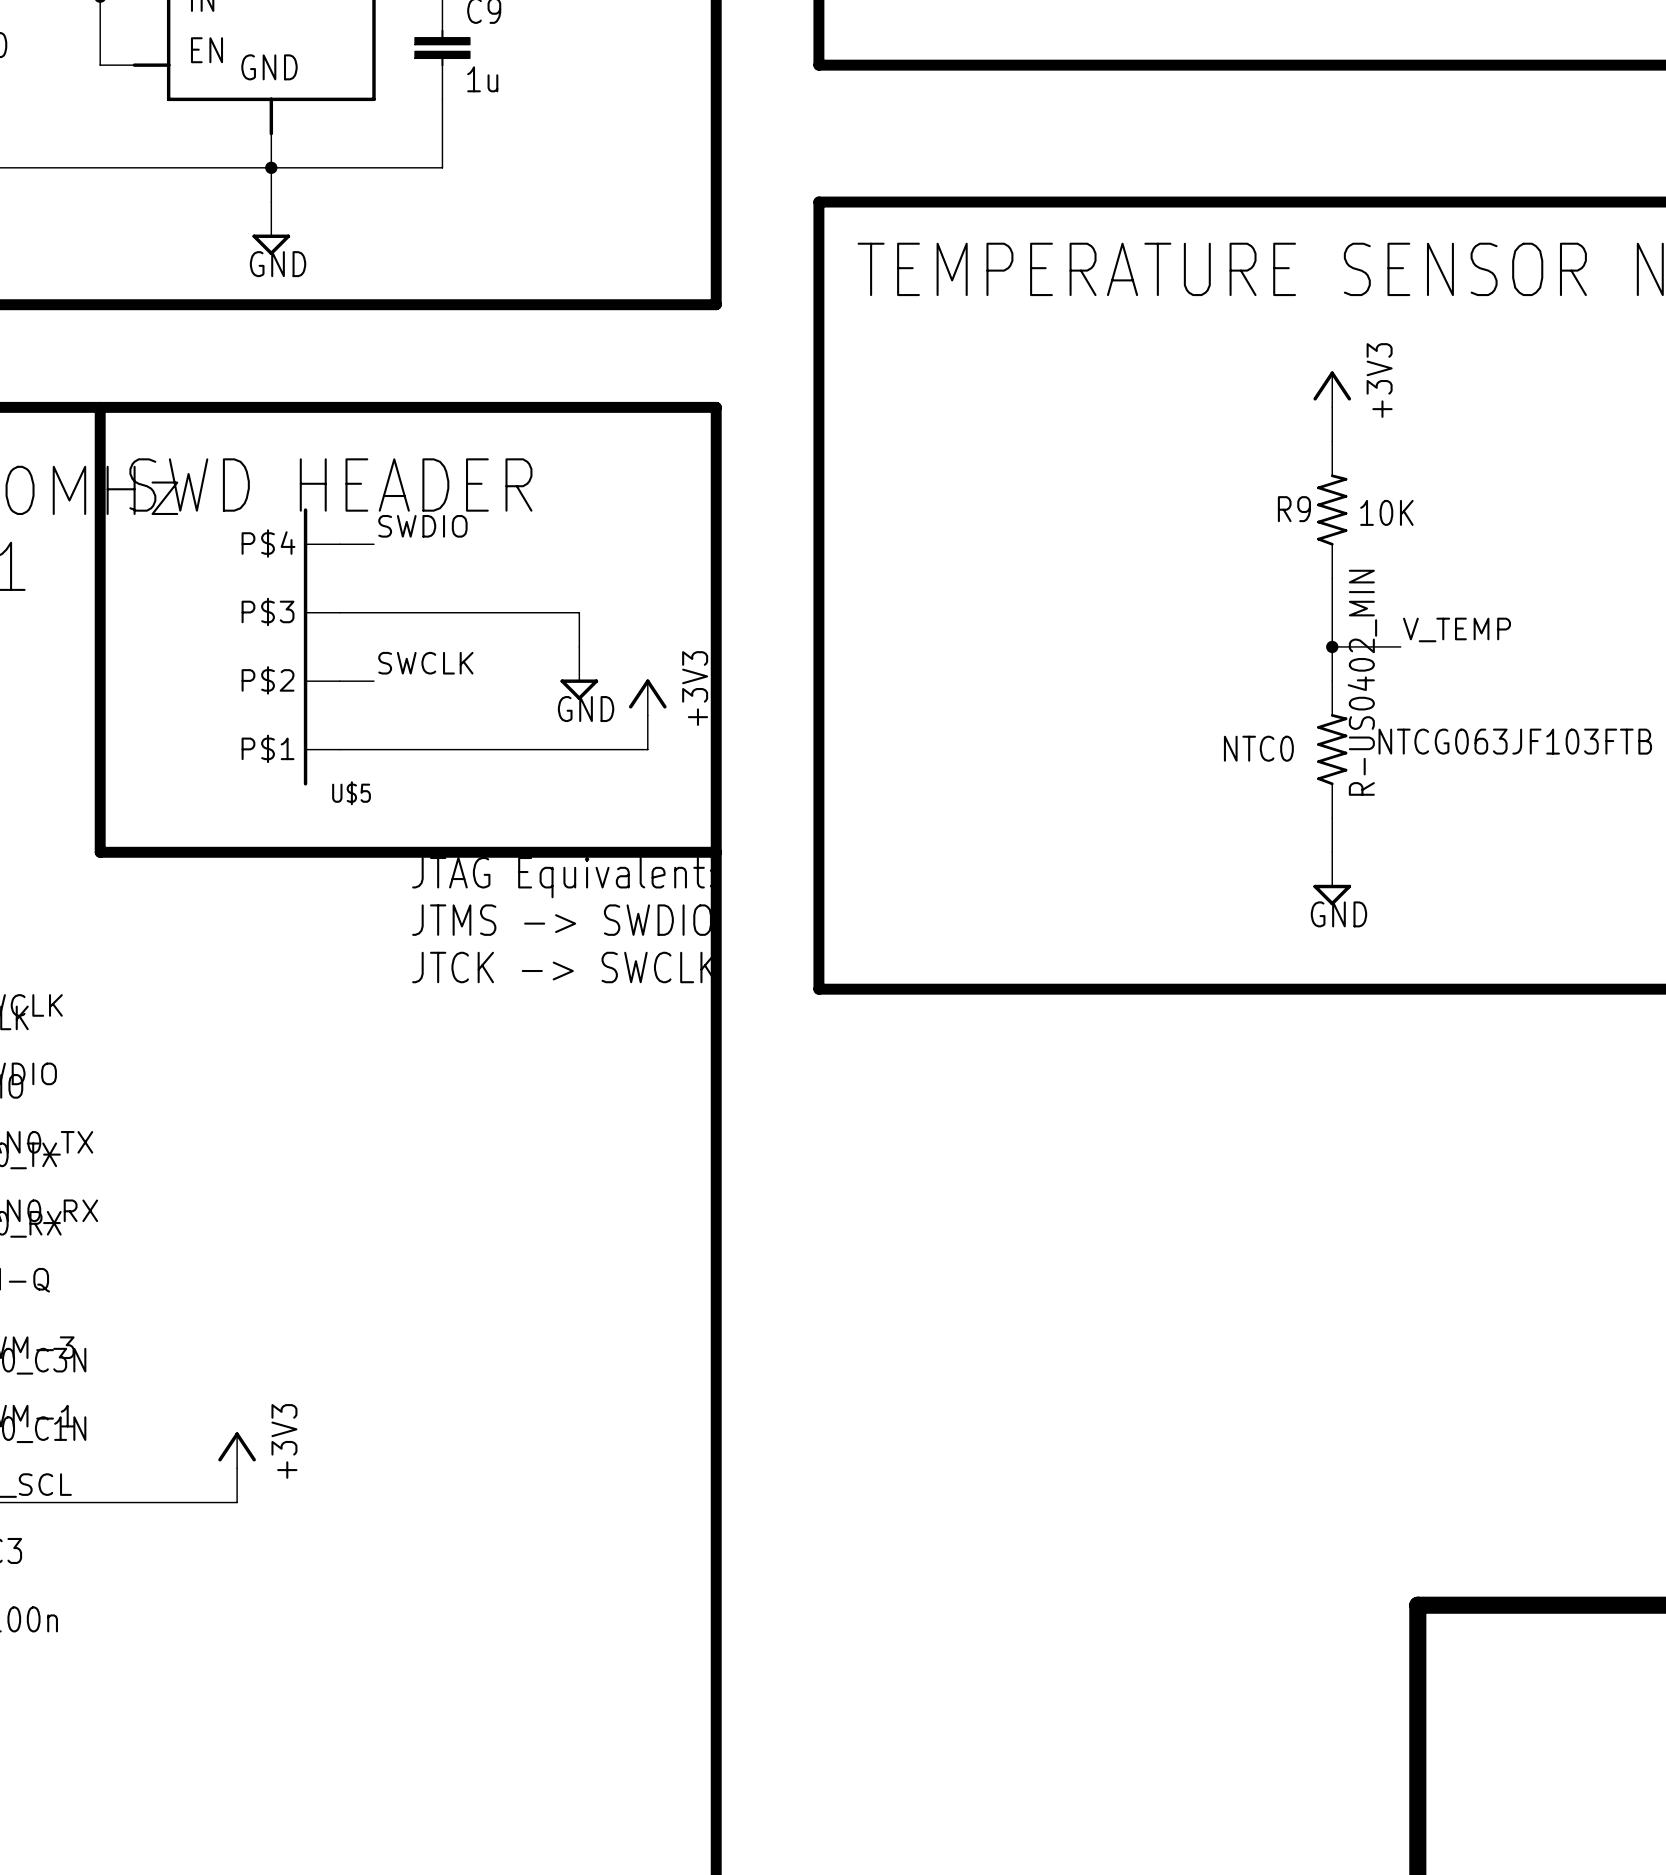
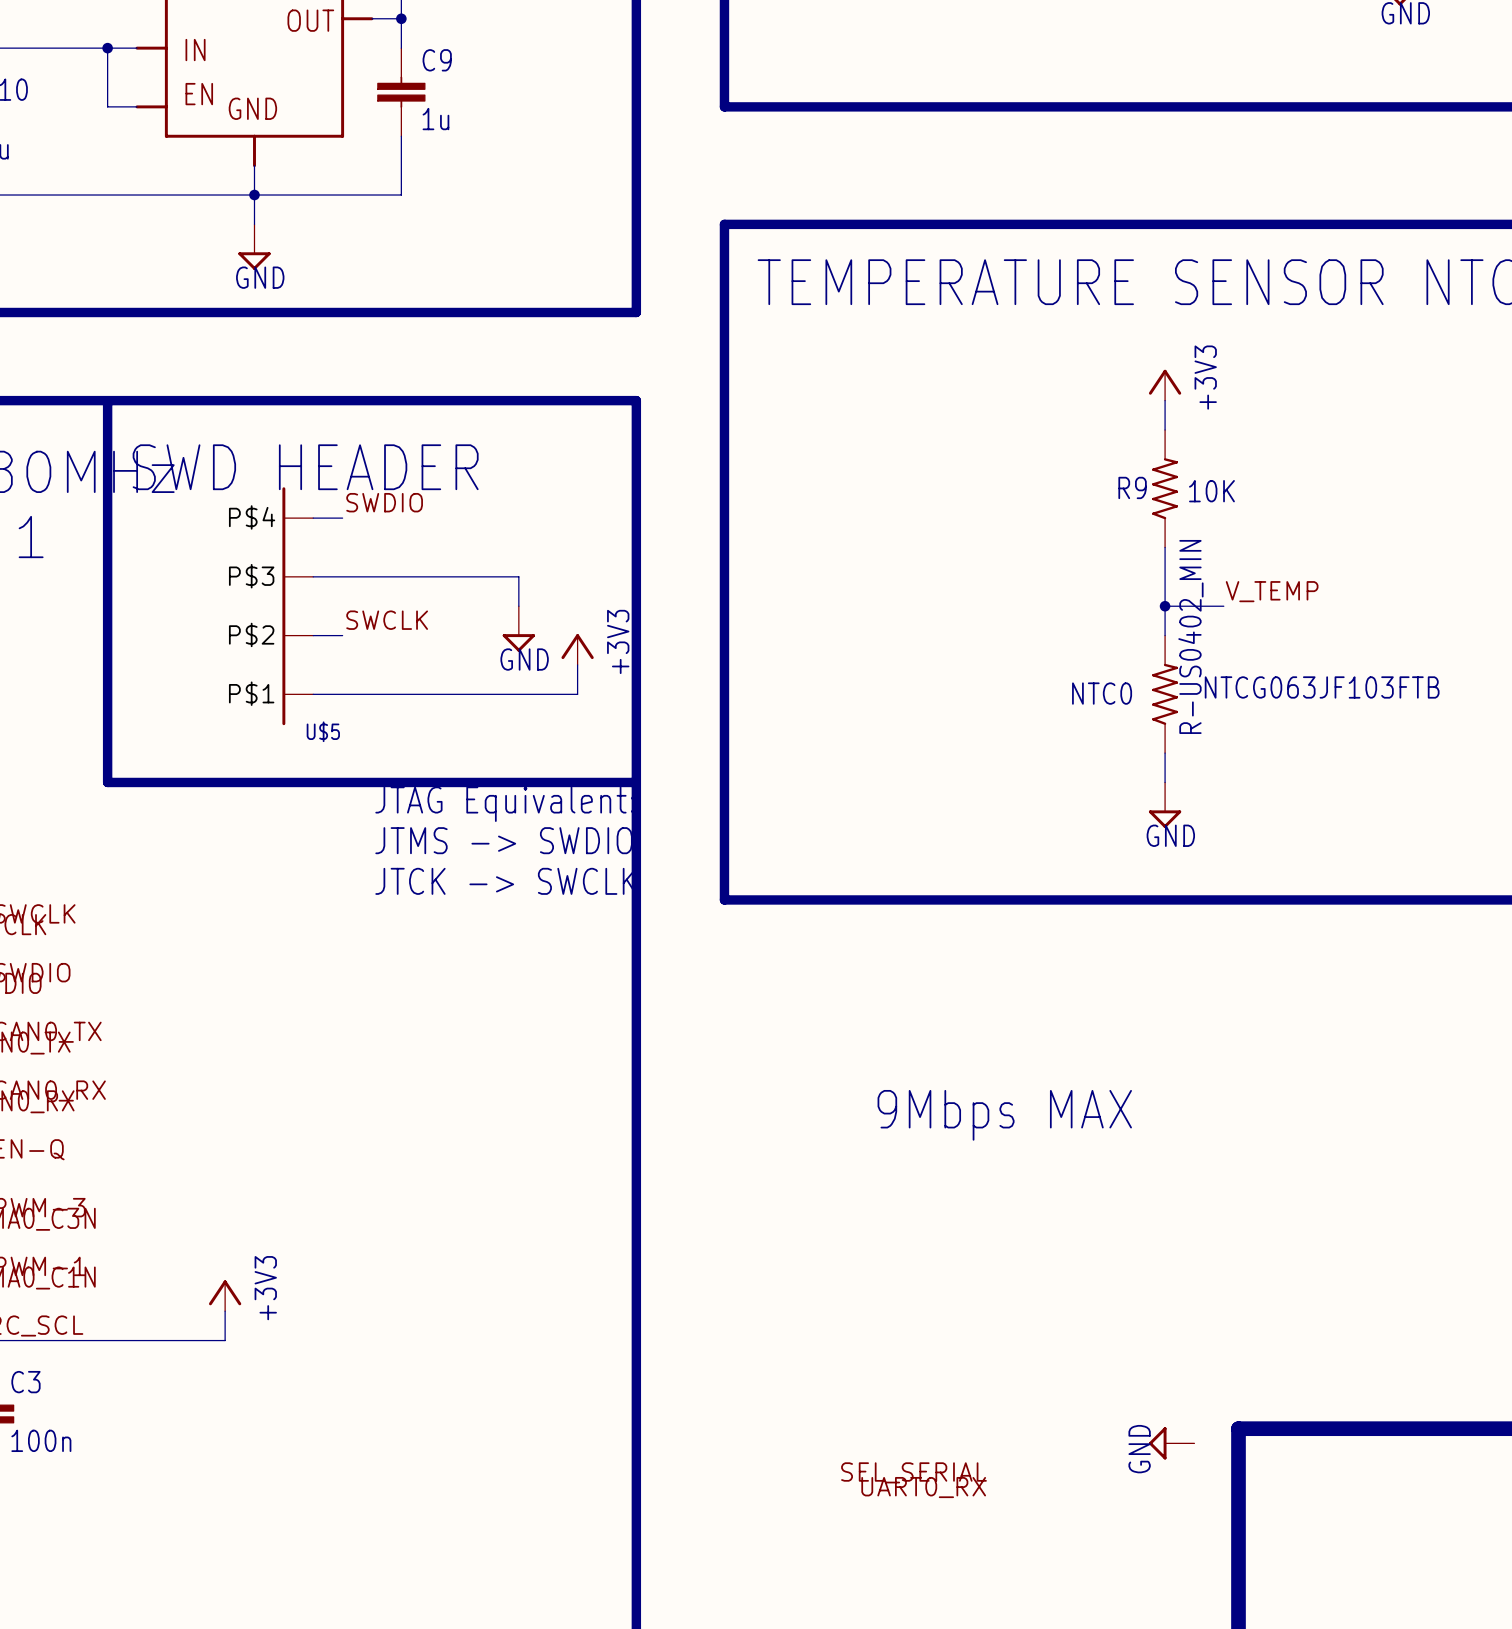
text: none -> 9Mbps MAX (1004, 1115)
power symbol: none -> GND (1171, 1443)
label: none -> SEL_SERIAL (913, 1472)
label: none -> UART0_RX (923, 1487)

